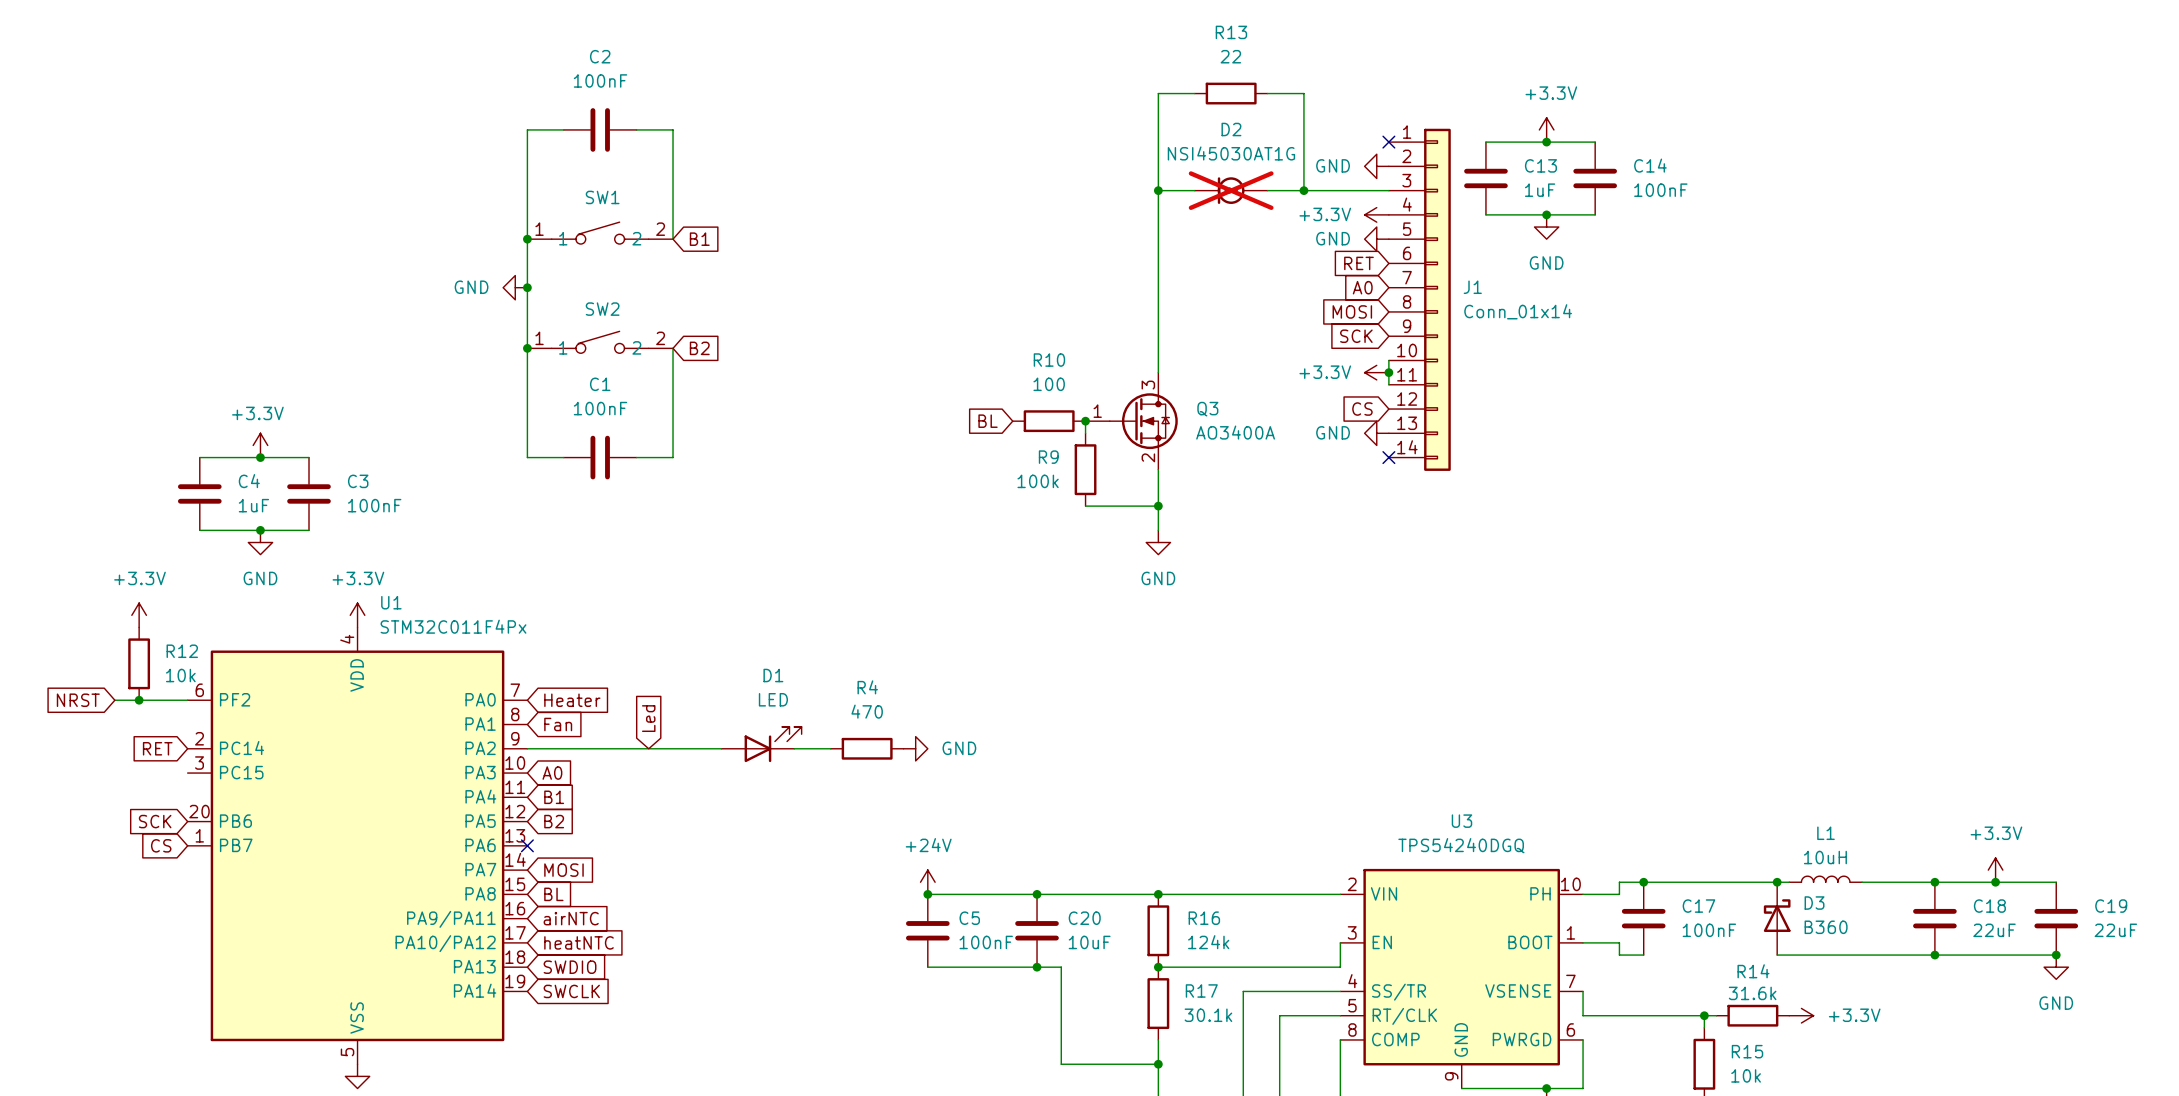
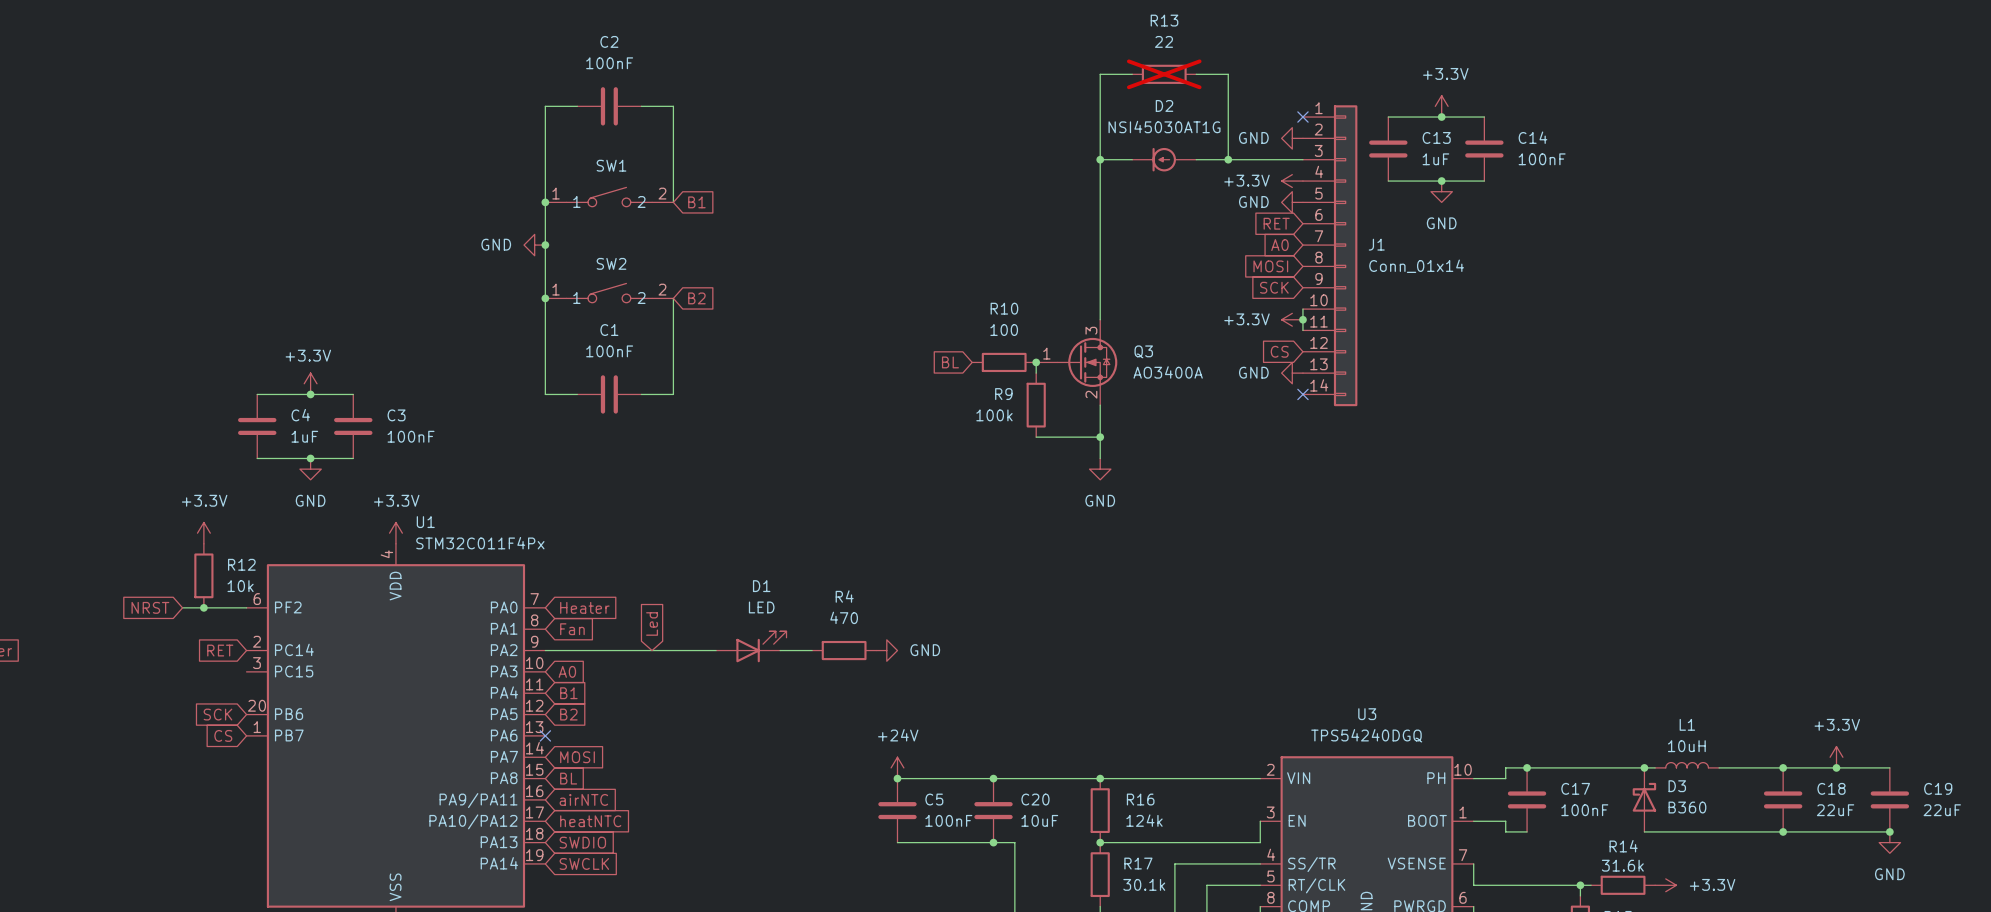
R13 do-not-place cross: none -> (1164, 74)
D2 do-not-place cross: (1231, 190) -> none

